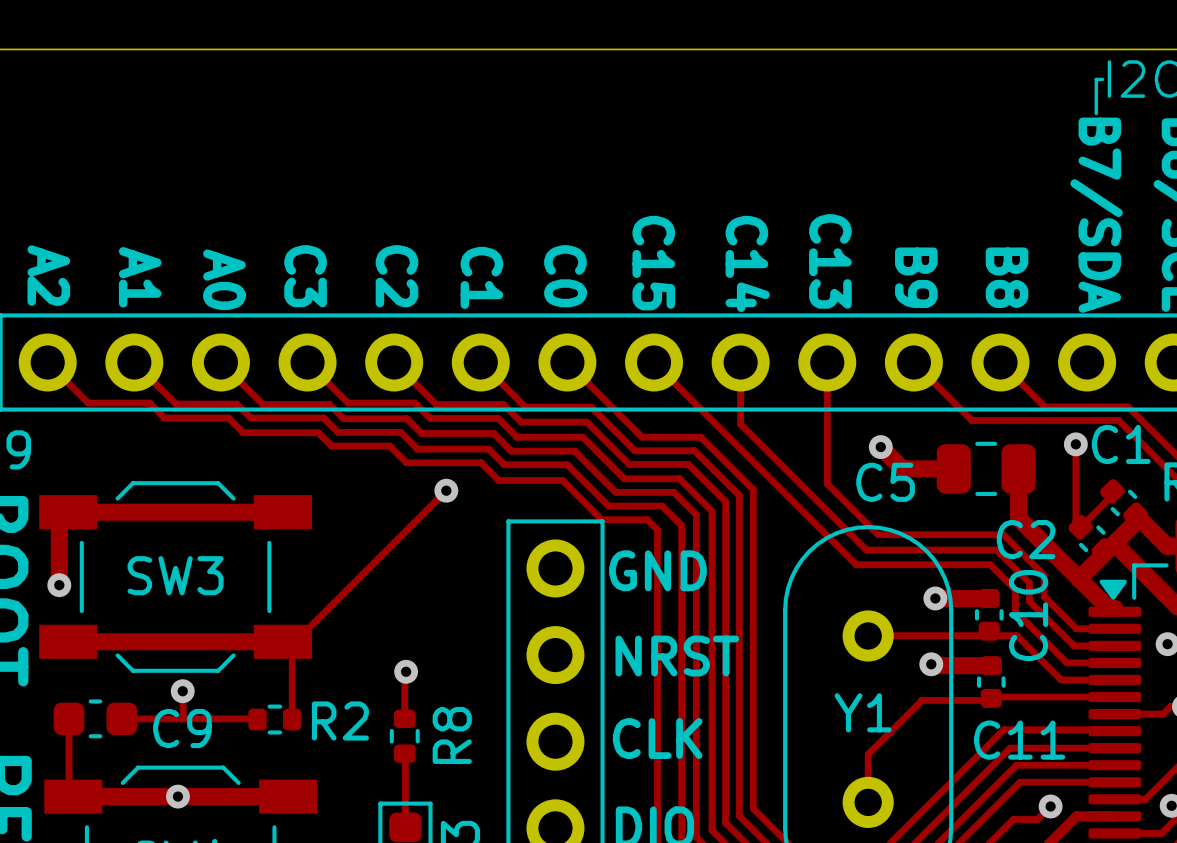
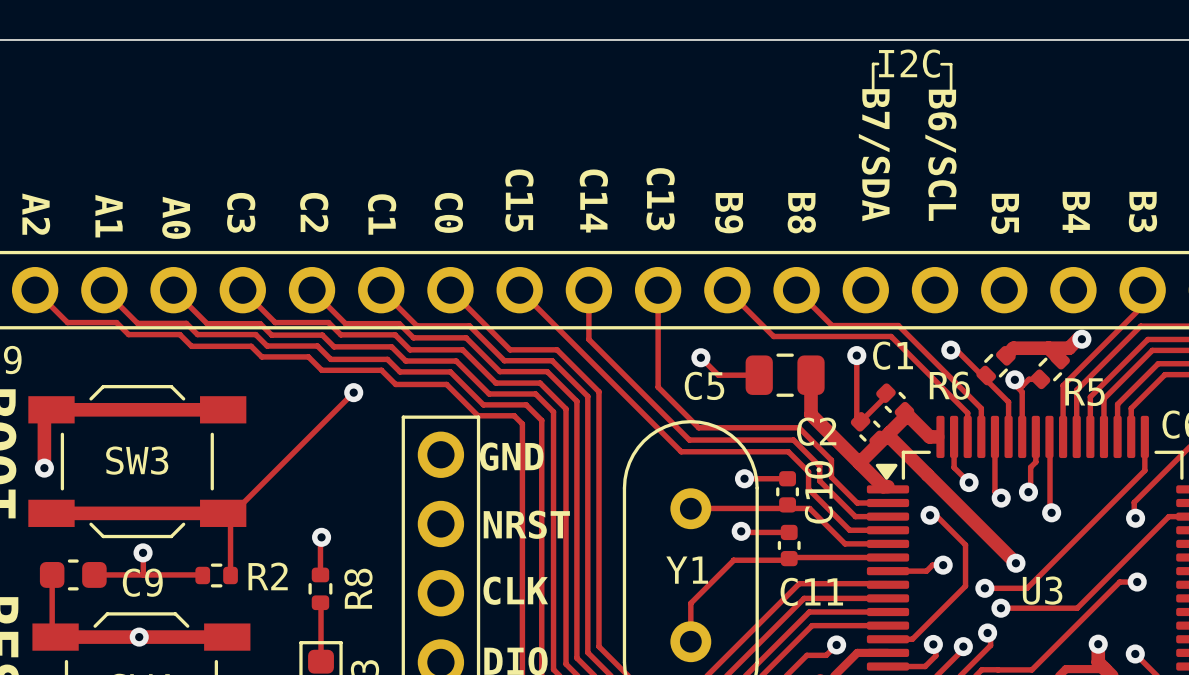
track width: thick (880, 447) (902, 468) (953, 468) -> thin (700, 357) (718, 375) (759, 375)
track width: thick (935, 598) (989, 598) -> thin (744, 478) (787, 478)
track width: thick (932, 665) (991, 665) -> thin (742, 532) (789, 532)

